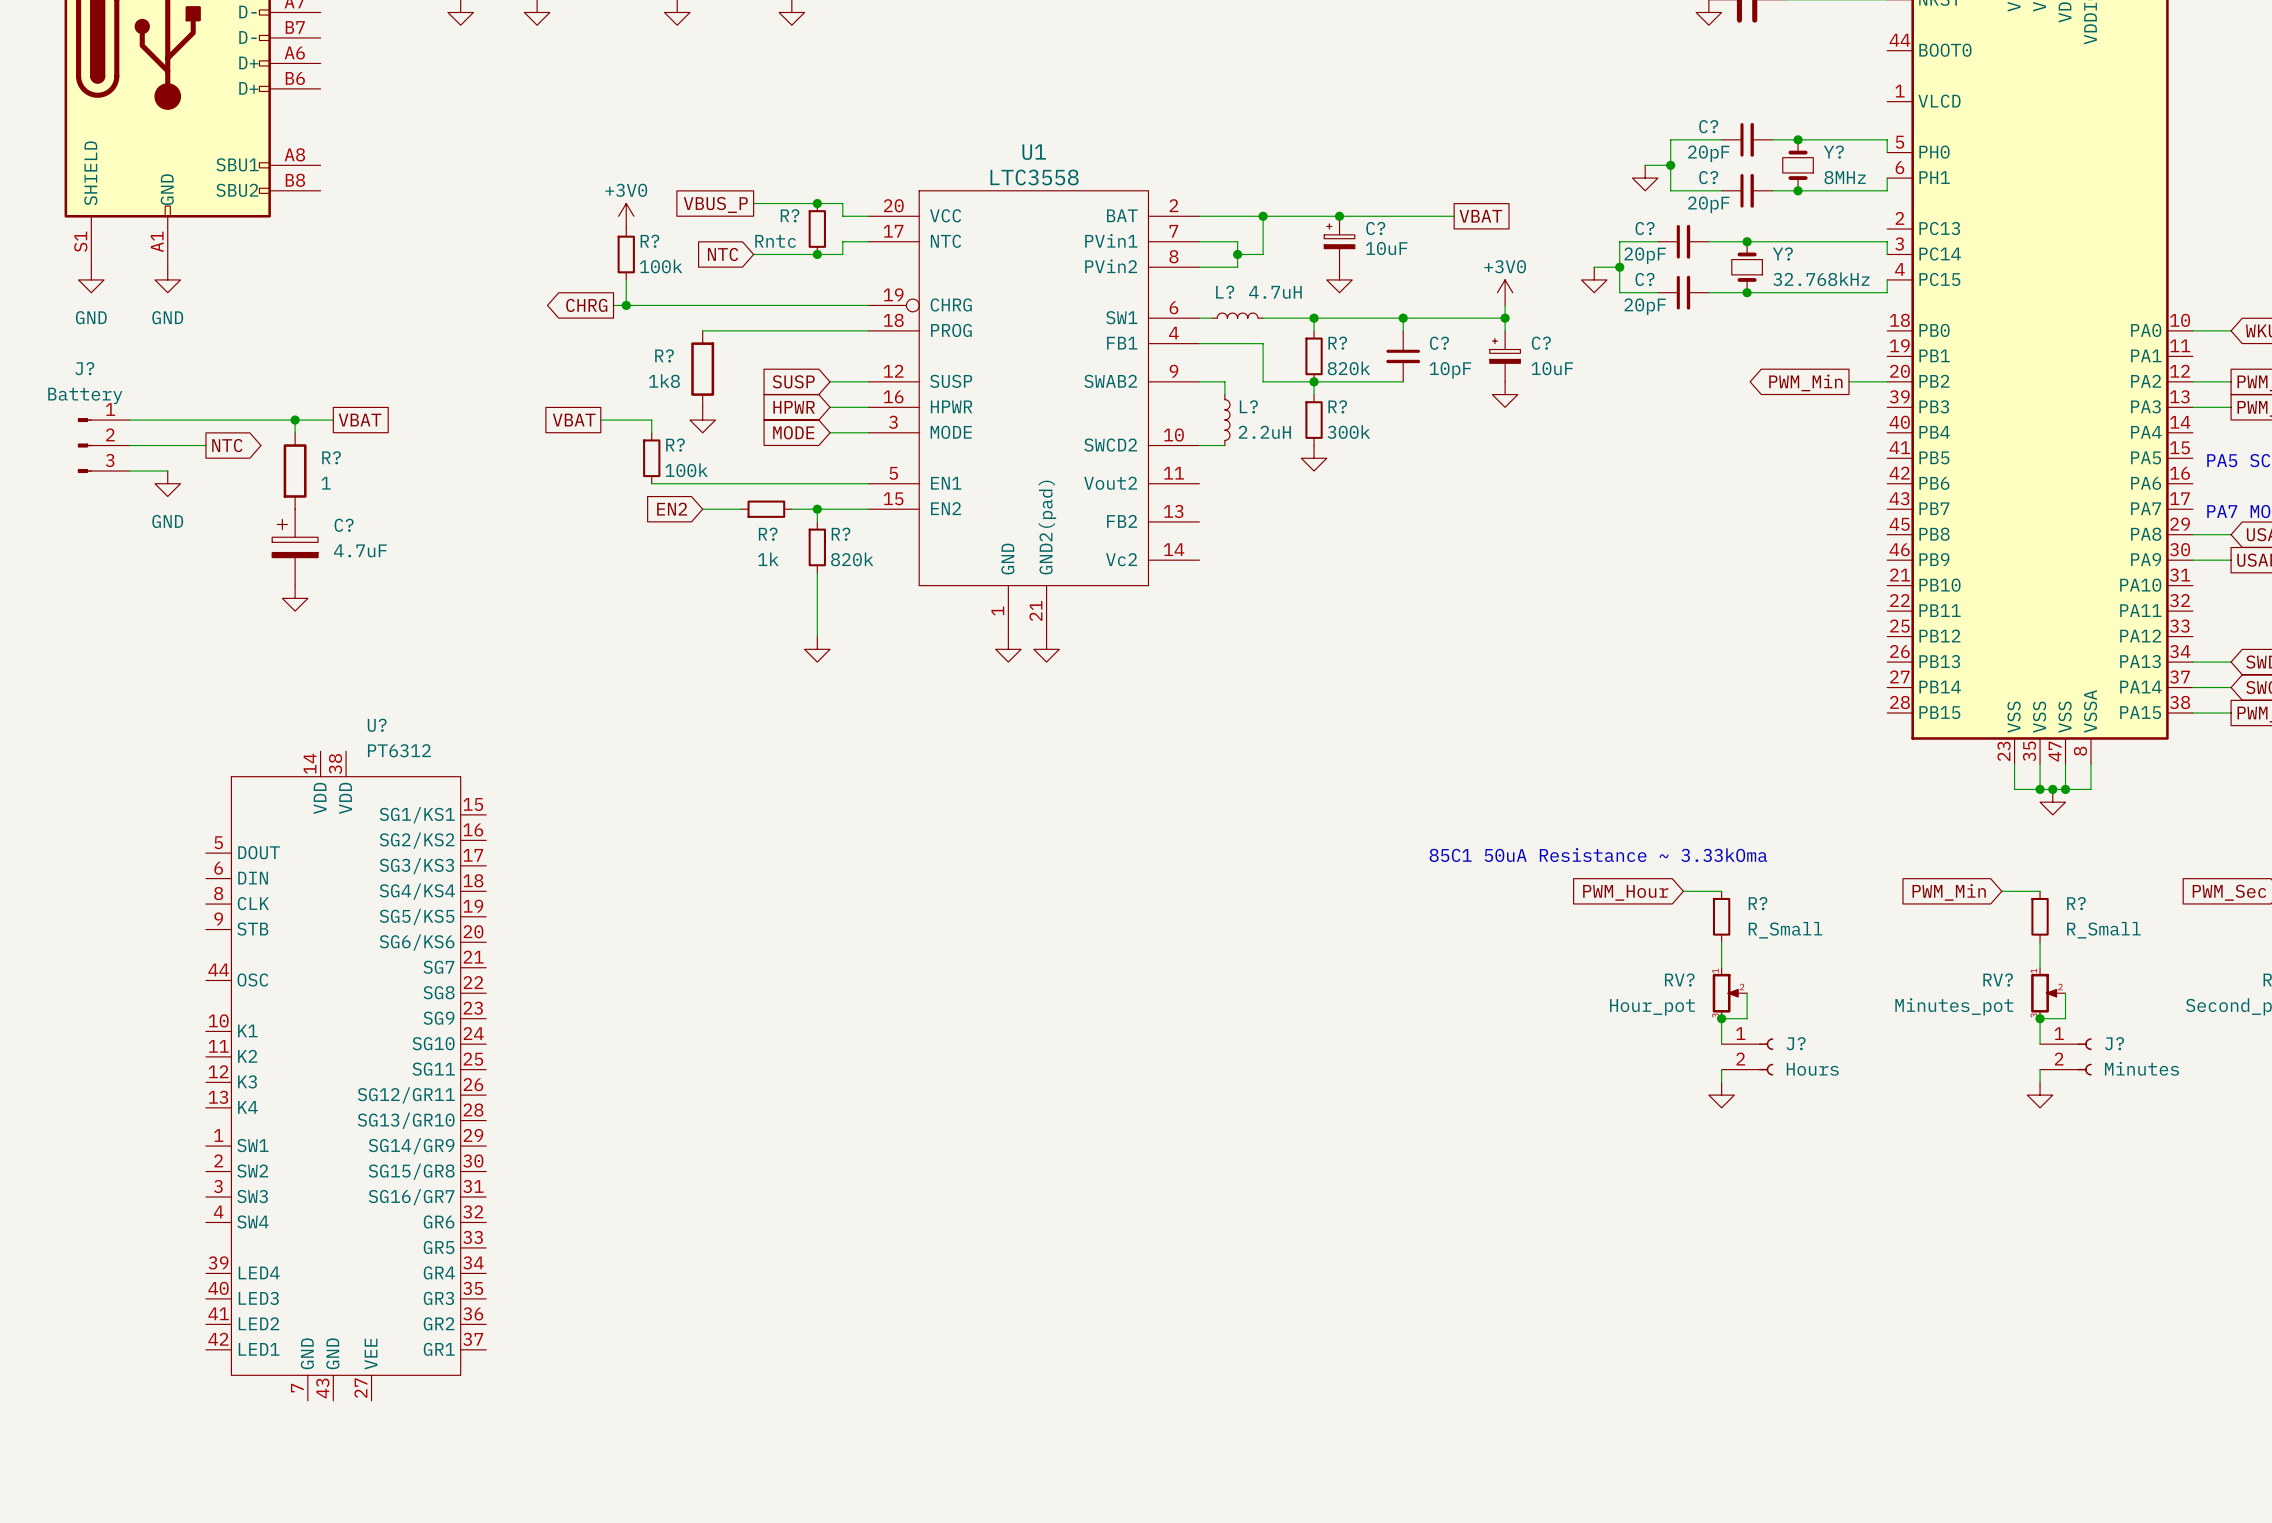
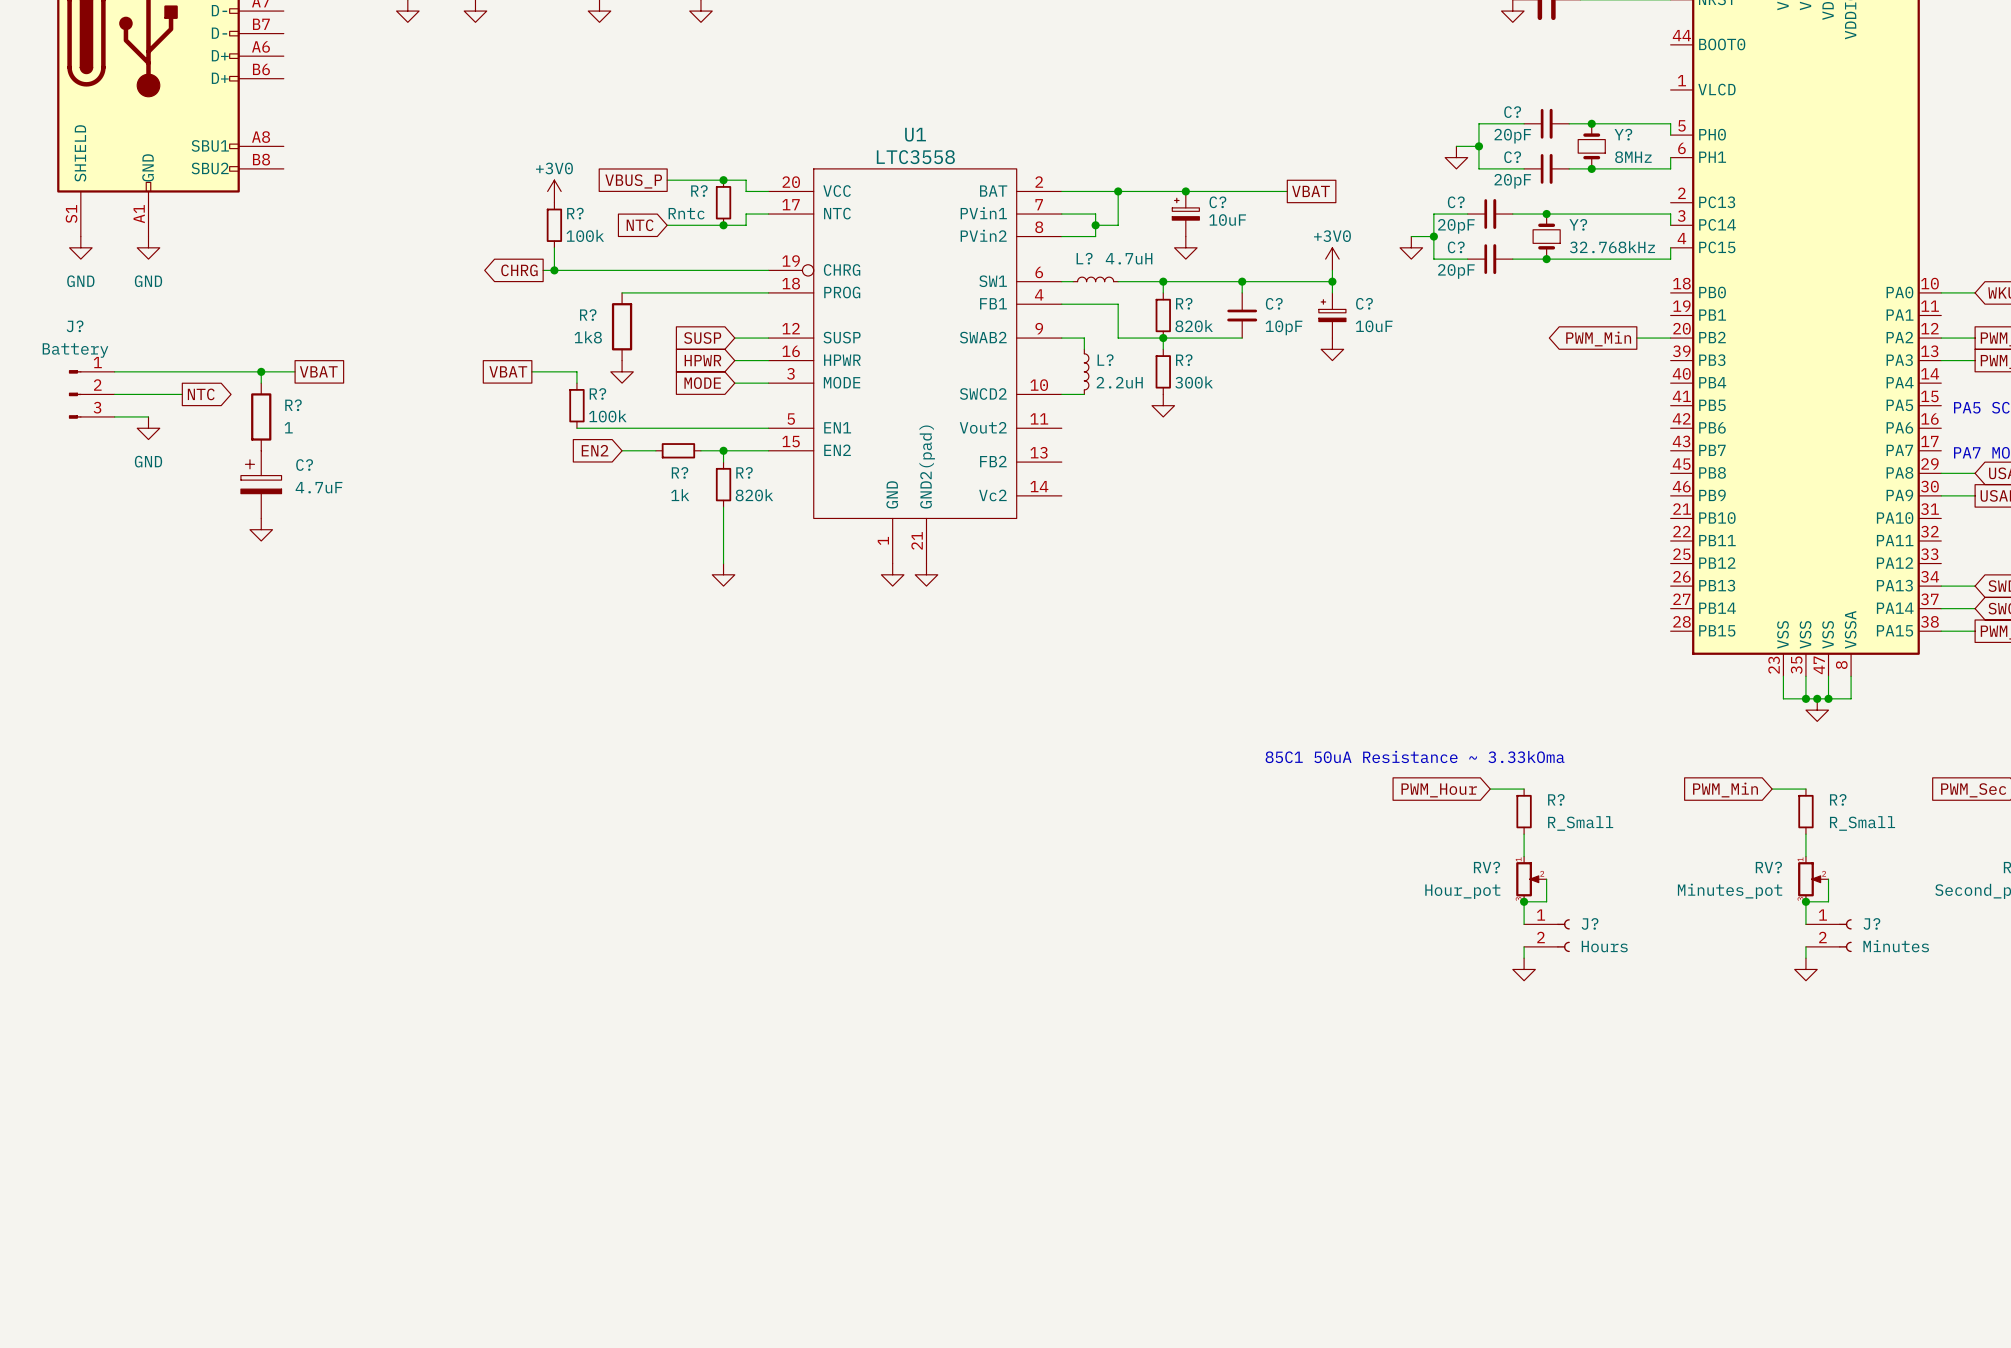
U?: PT6312 (346, 1076) -> none

